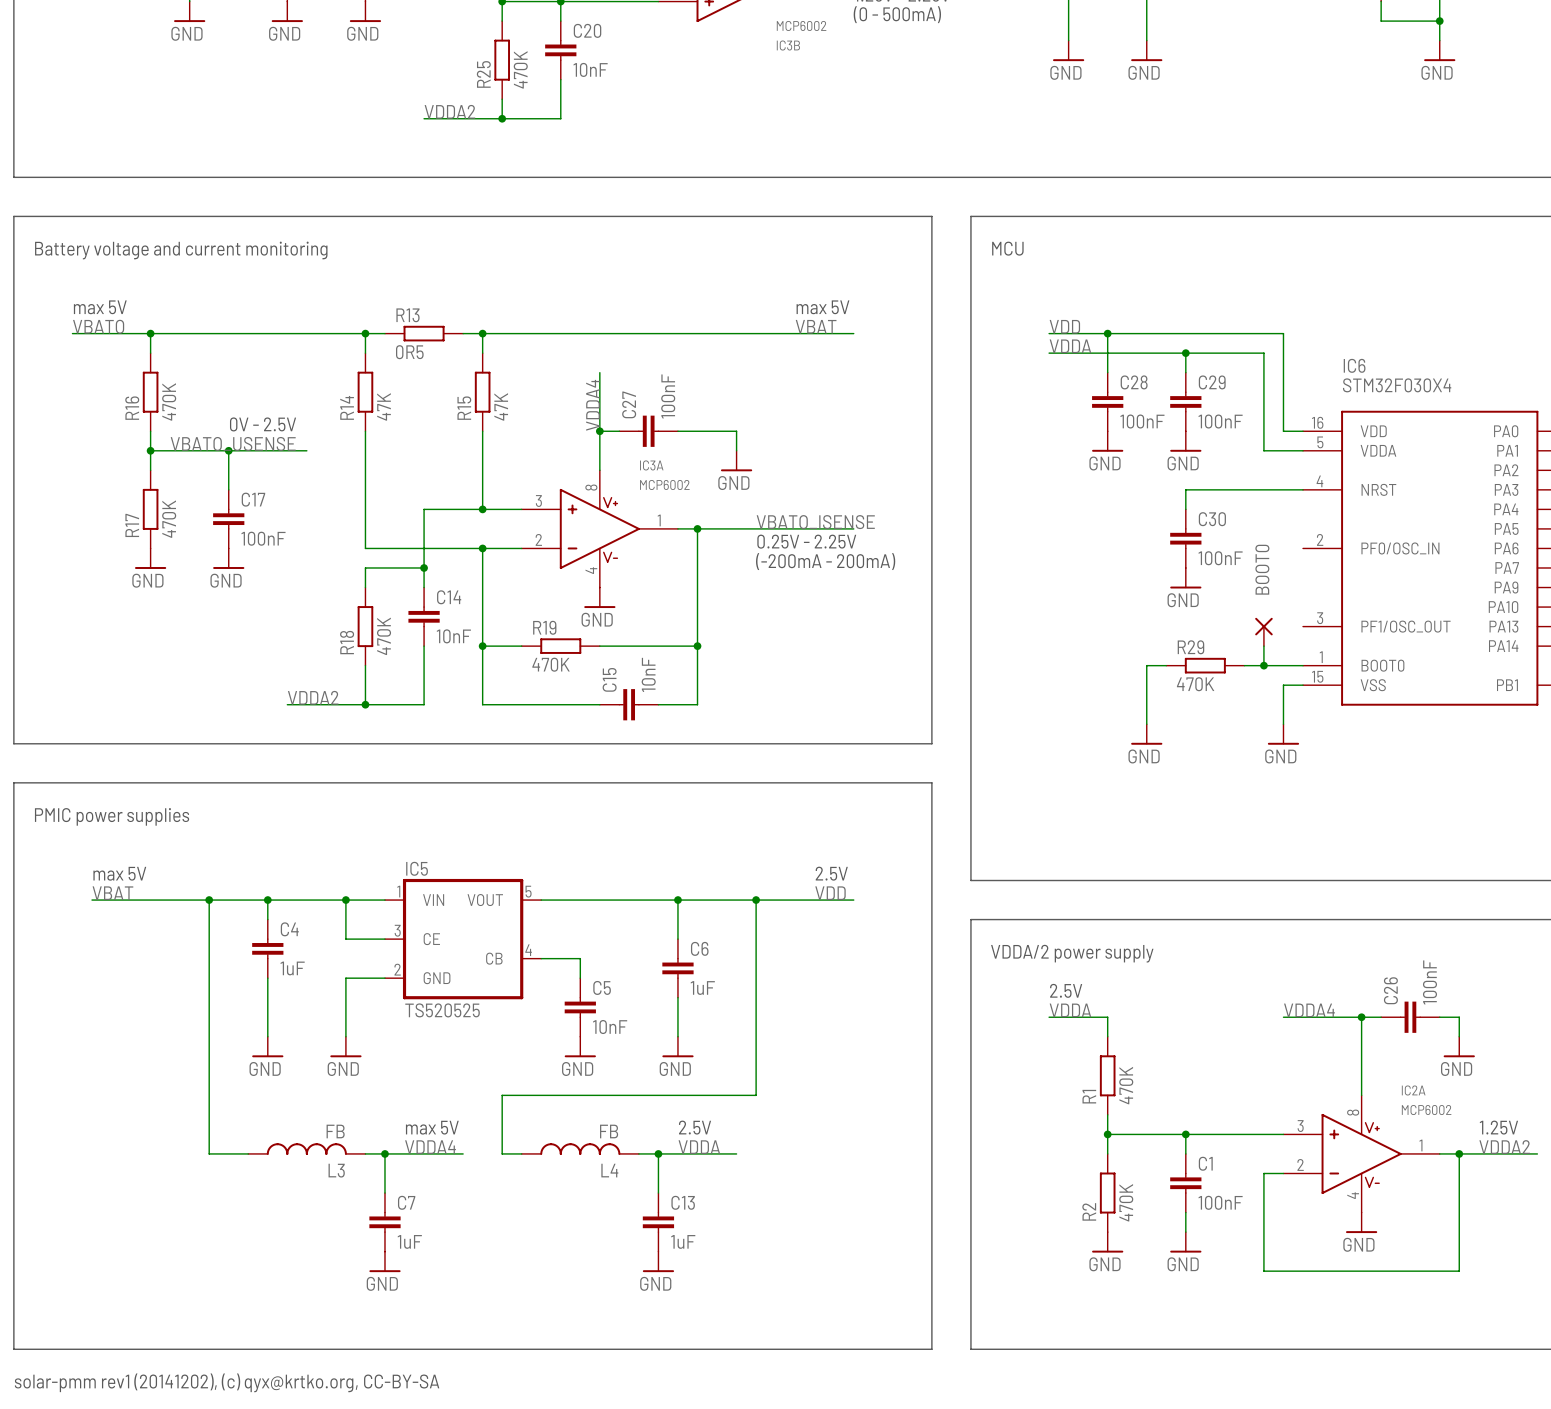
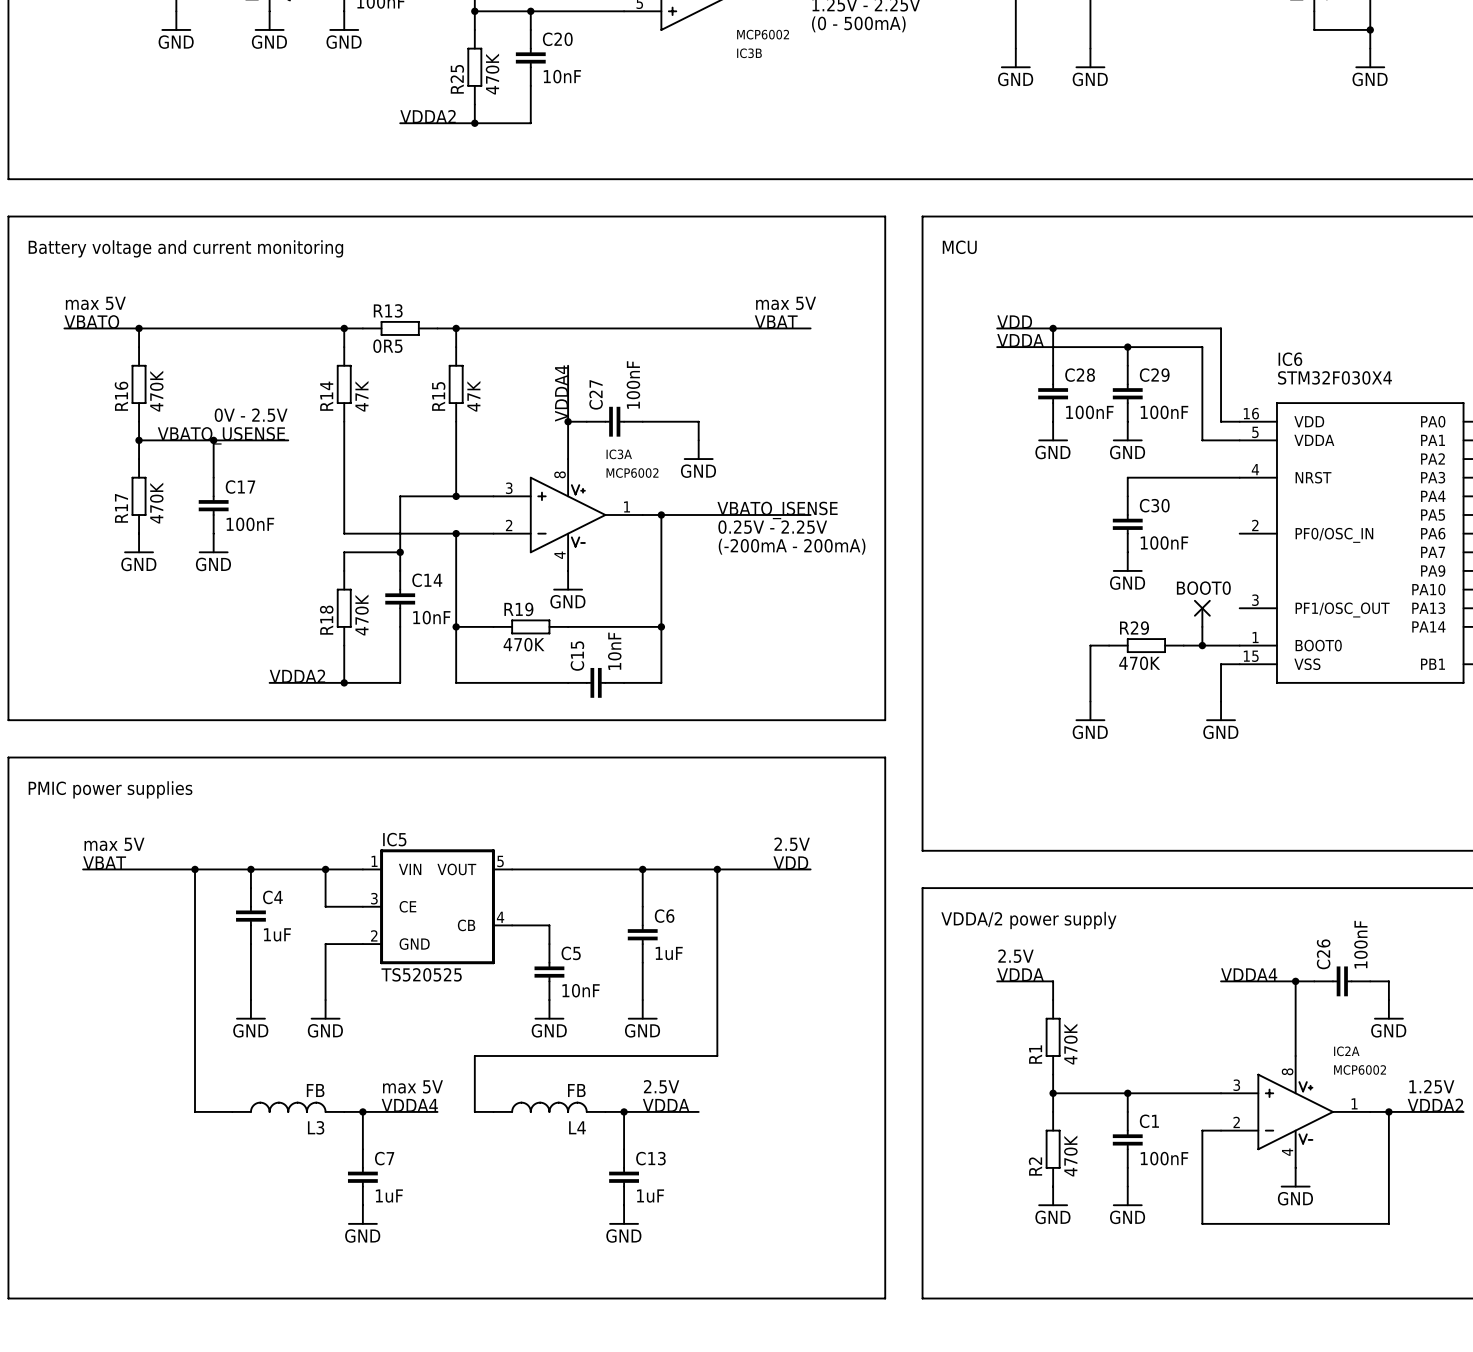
BOOT0 name rotation: 0° (1262, 569) -> 90° clockwise (1203, 588)
text: solar-pmm rev1 (20141202), (c) qyx@krtko.org, CC-BY-SA (227, 1382) -> none

